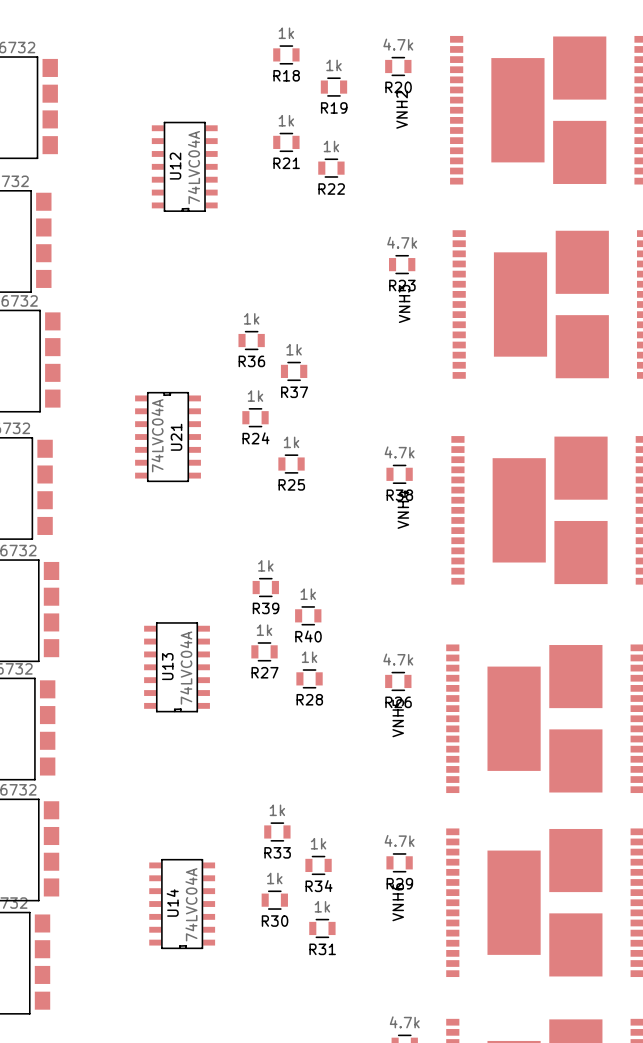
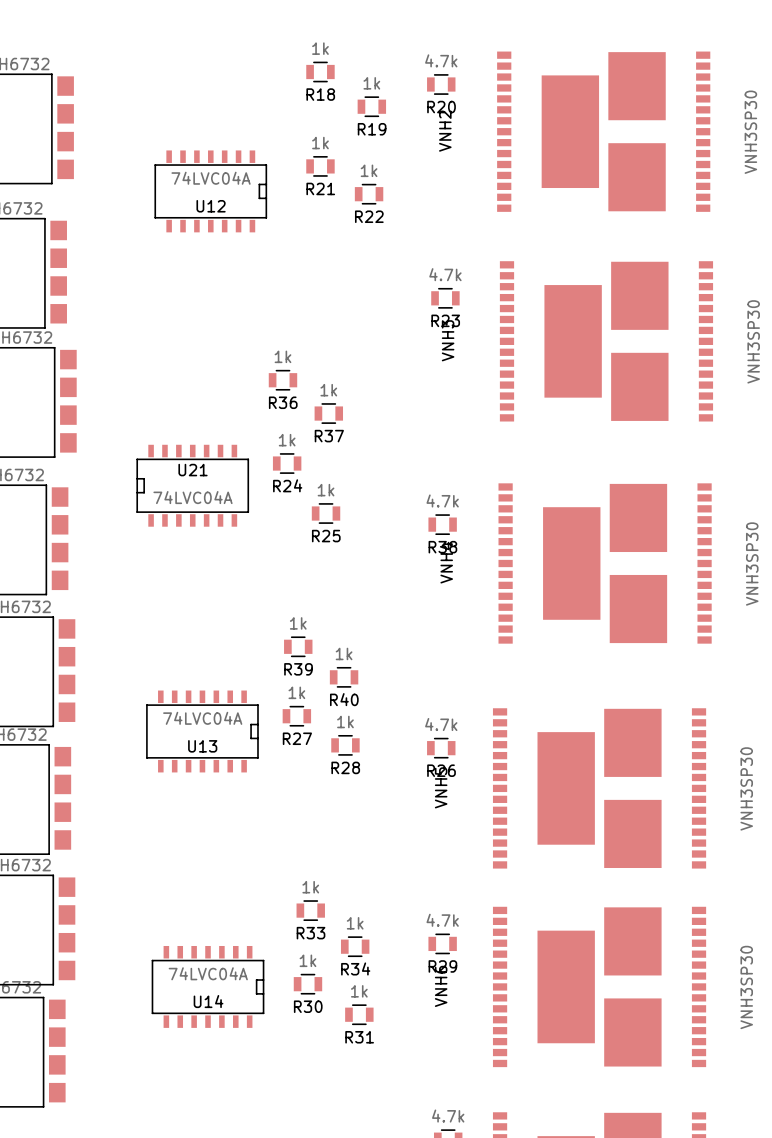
U12 footprint: [151, 121, 218, 212] -> [154, 150, 268, 233]
U21 footprint: [135, 391, 201, 483] -> [136, 444, 250, 527]
U13 footprint: [144, 622, 210, 713] -> [146, 690, 259, 773]
U14 footprint: [149, 858, 216, 950] -> [151, 945, 265, 1028]

